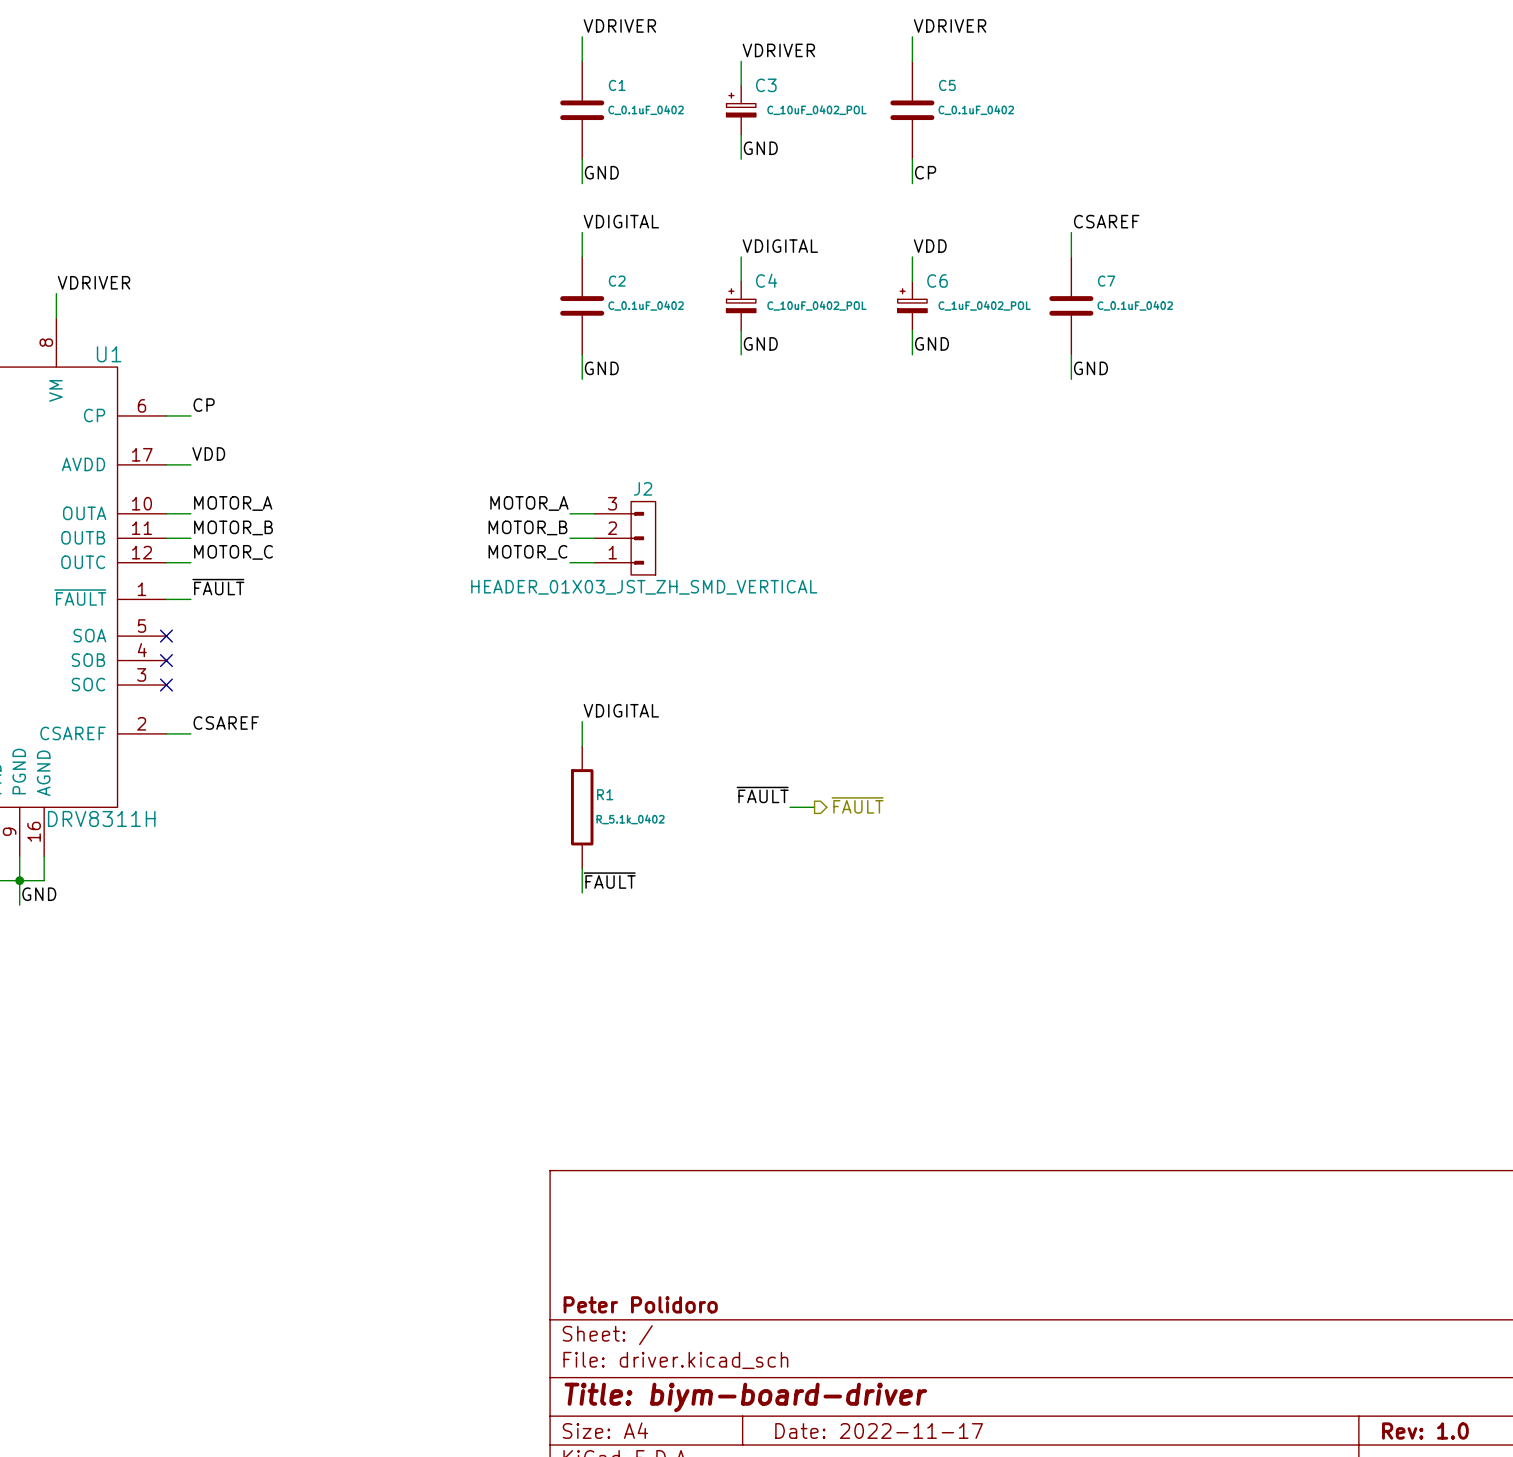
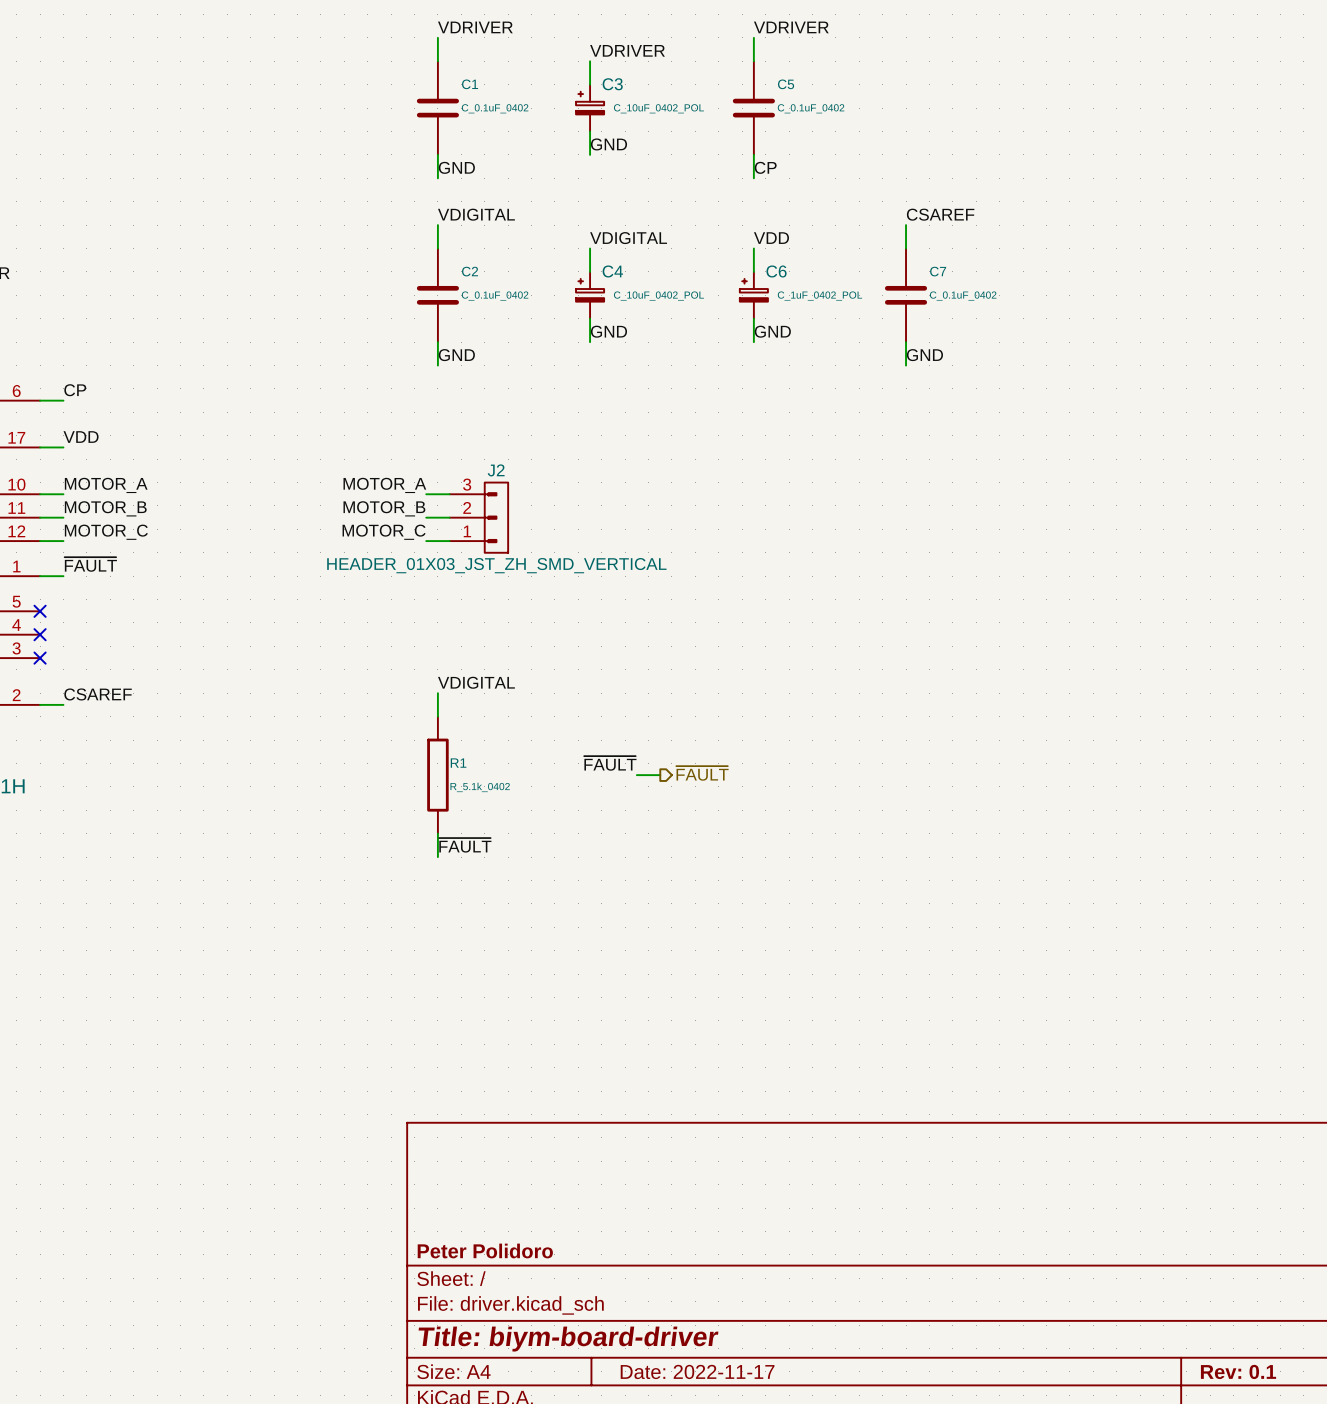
title block: Rev: 1.0 (1425, 1431) -> Rev: 0.1 (1238, 1371)

